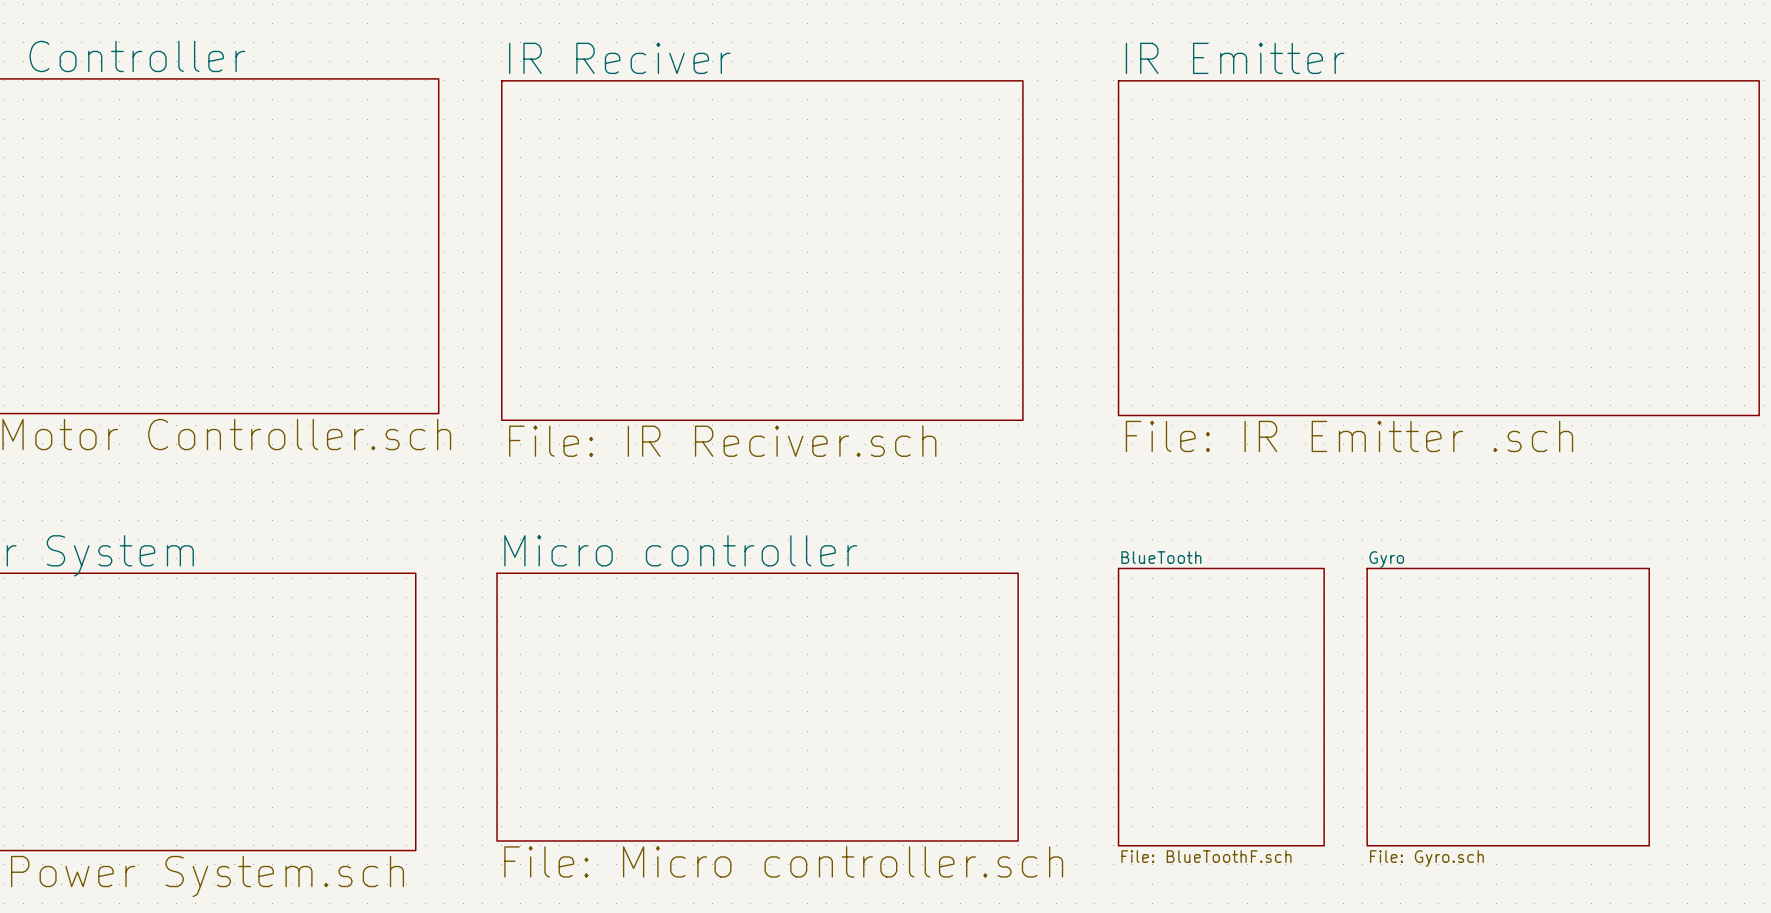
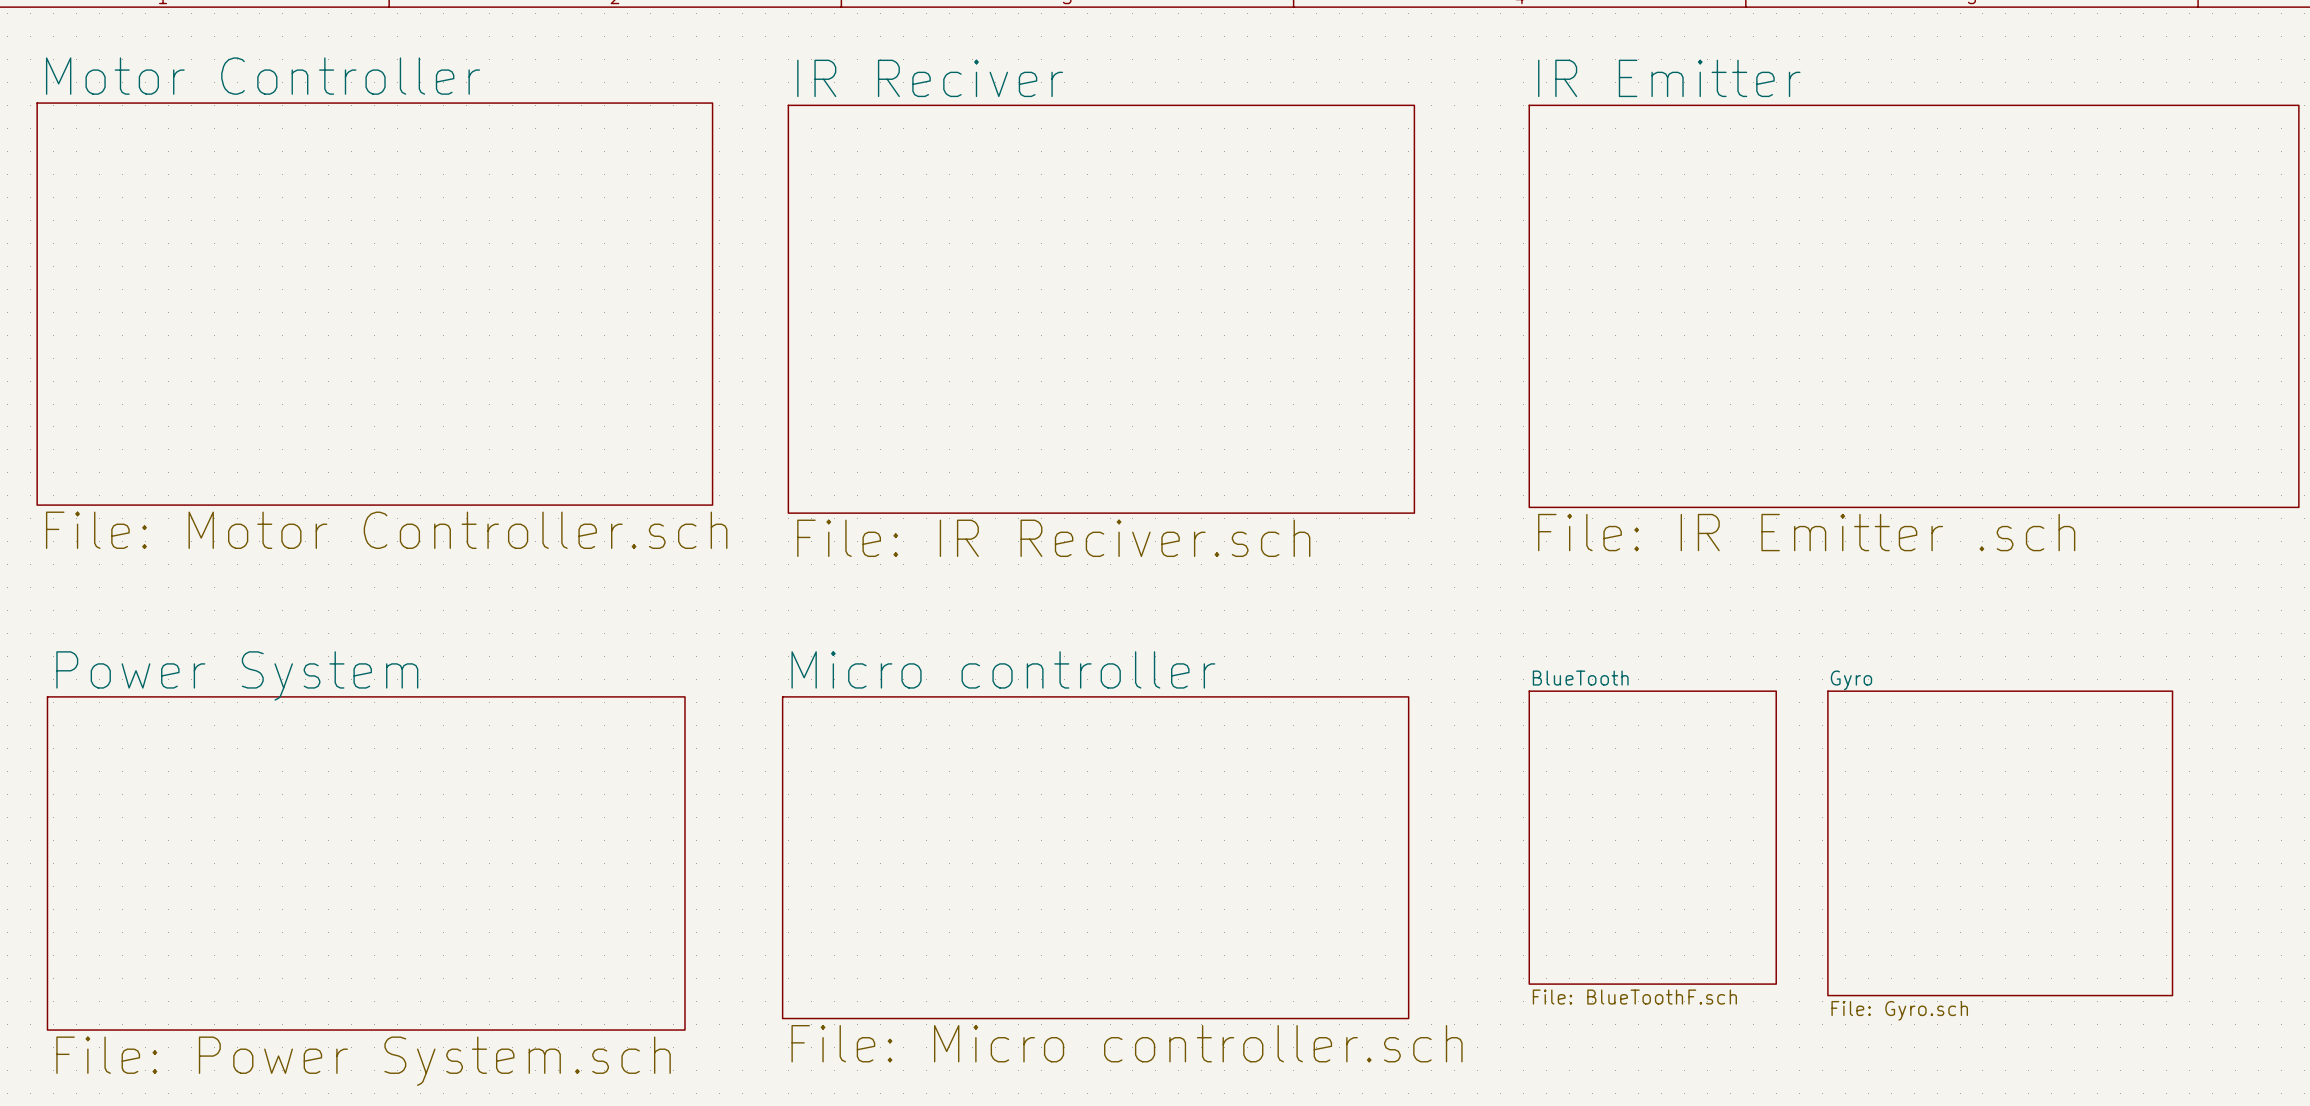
sheet BlueTooth: none -> File: BlueToothF.sch (1652, 837)
sheet Gyro: none -> File: Gyro.sch (2000, 843)
sheet BlueTooth: File: BlueToothF.sch (1221, 707) -> none
sheet Gyro: File: Gyro.sch (1508, 707) -> none

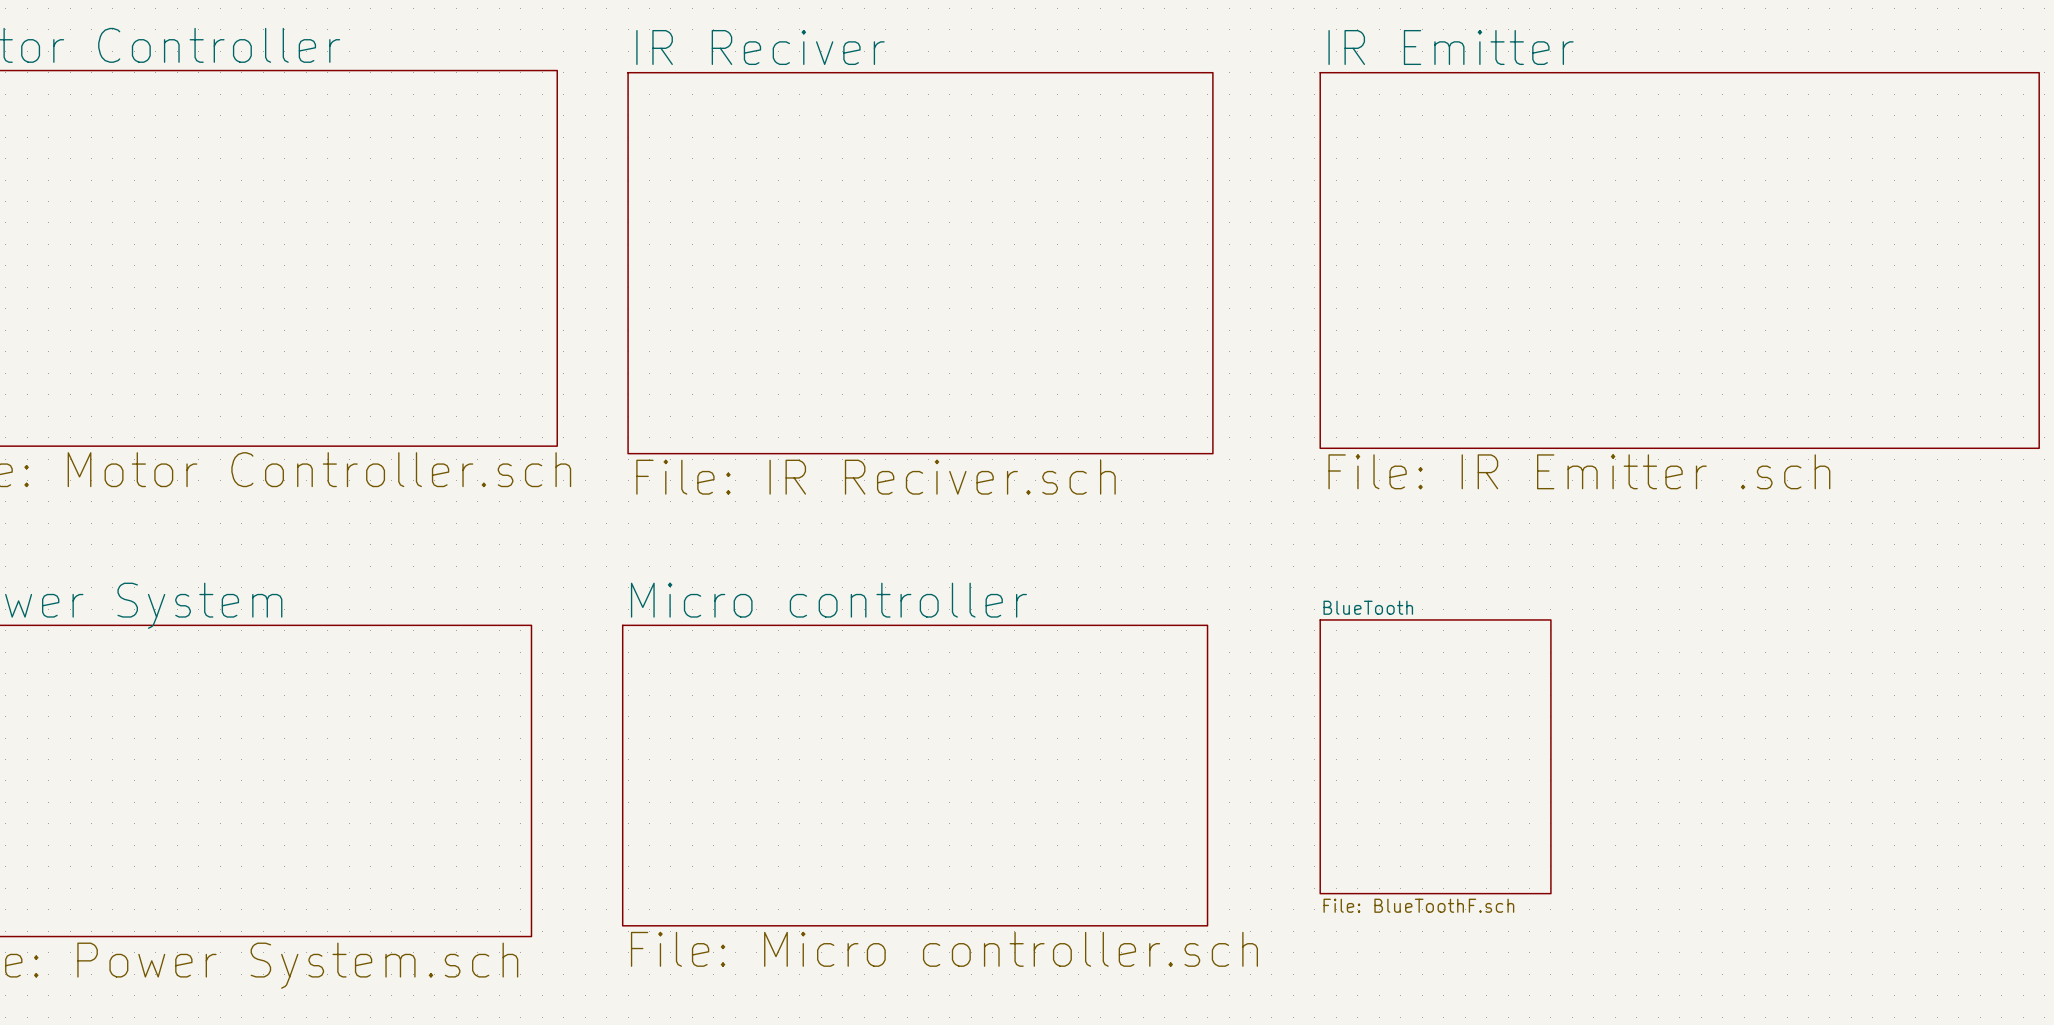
sheet Gyro: File: Gyro.sch (2000, 843) -> none

